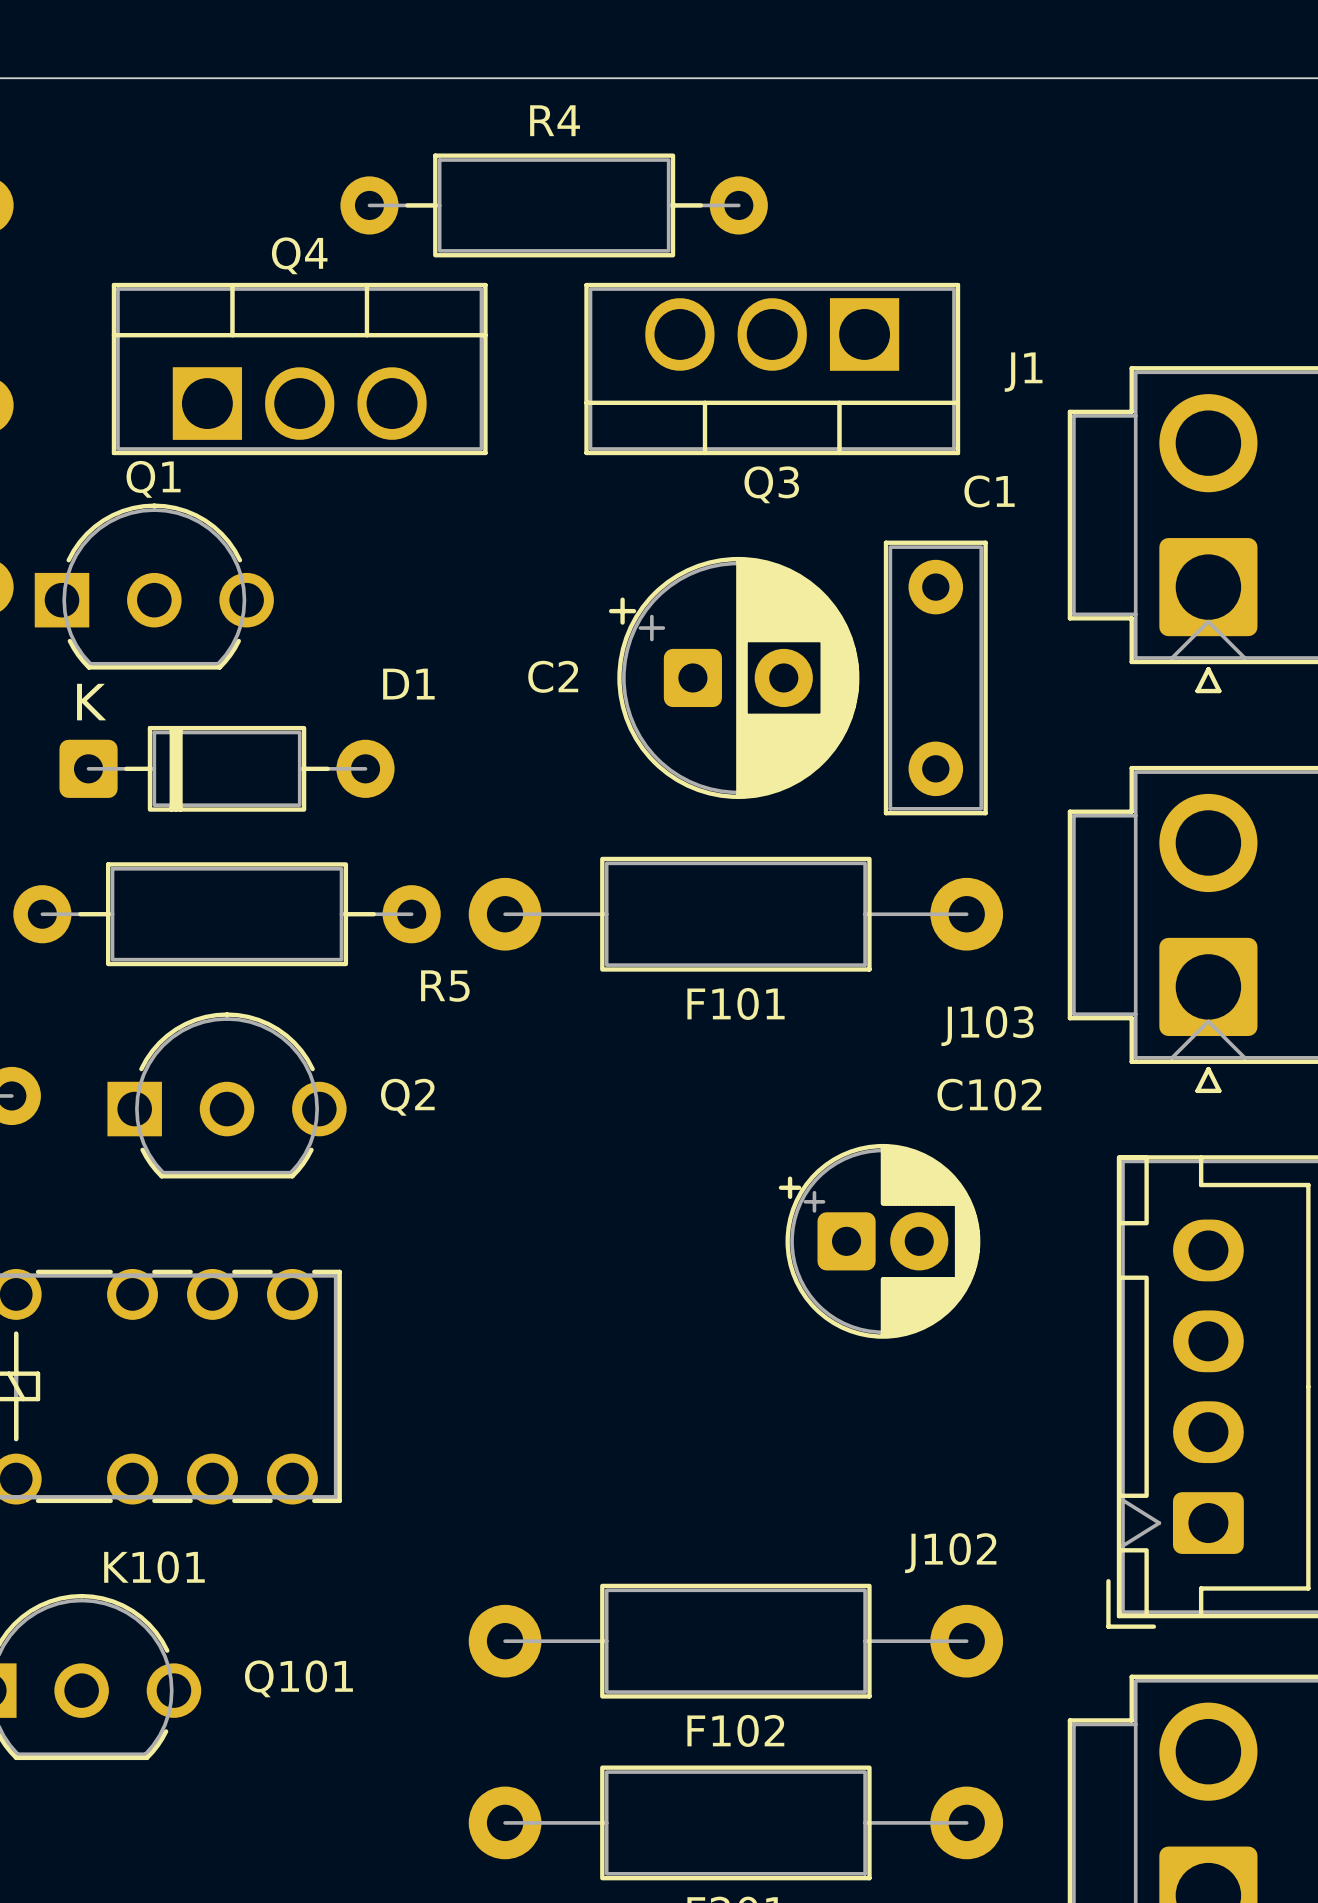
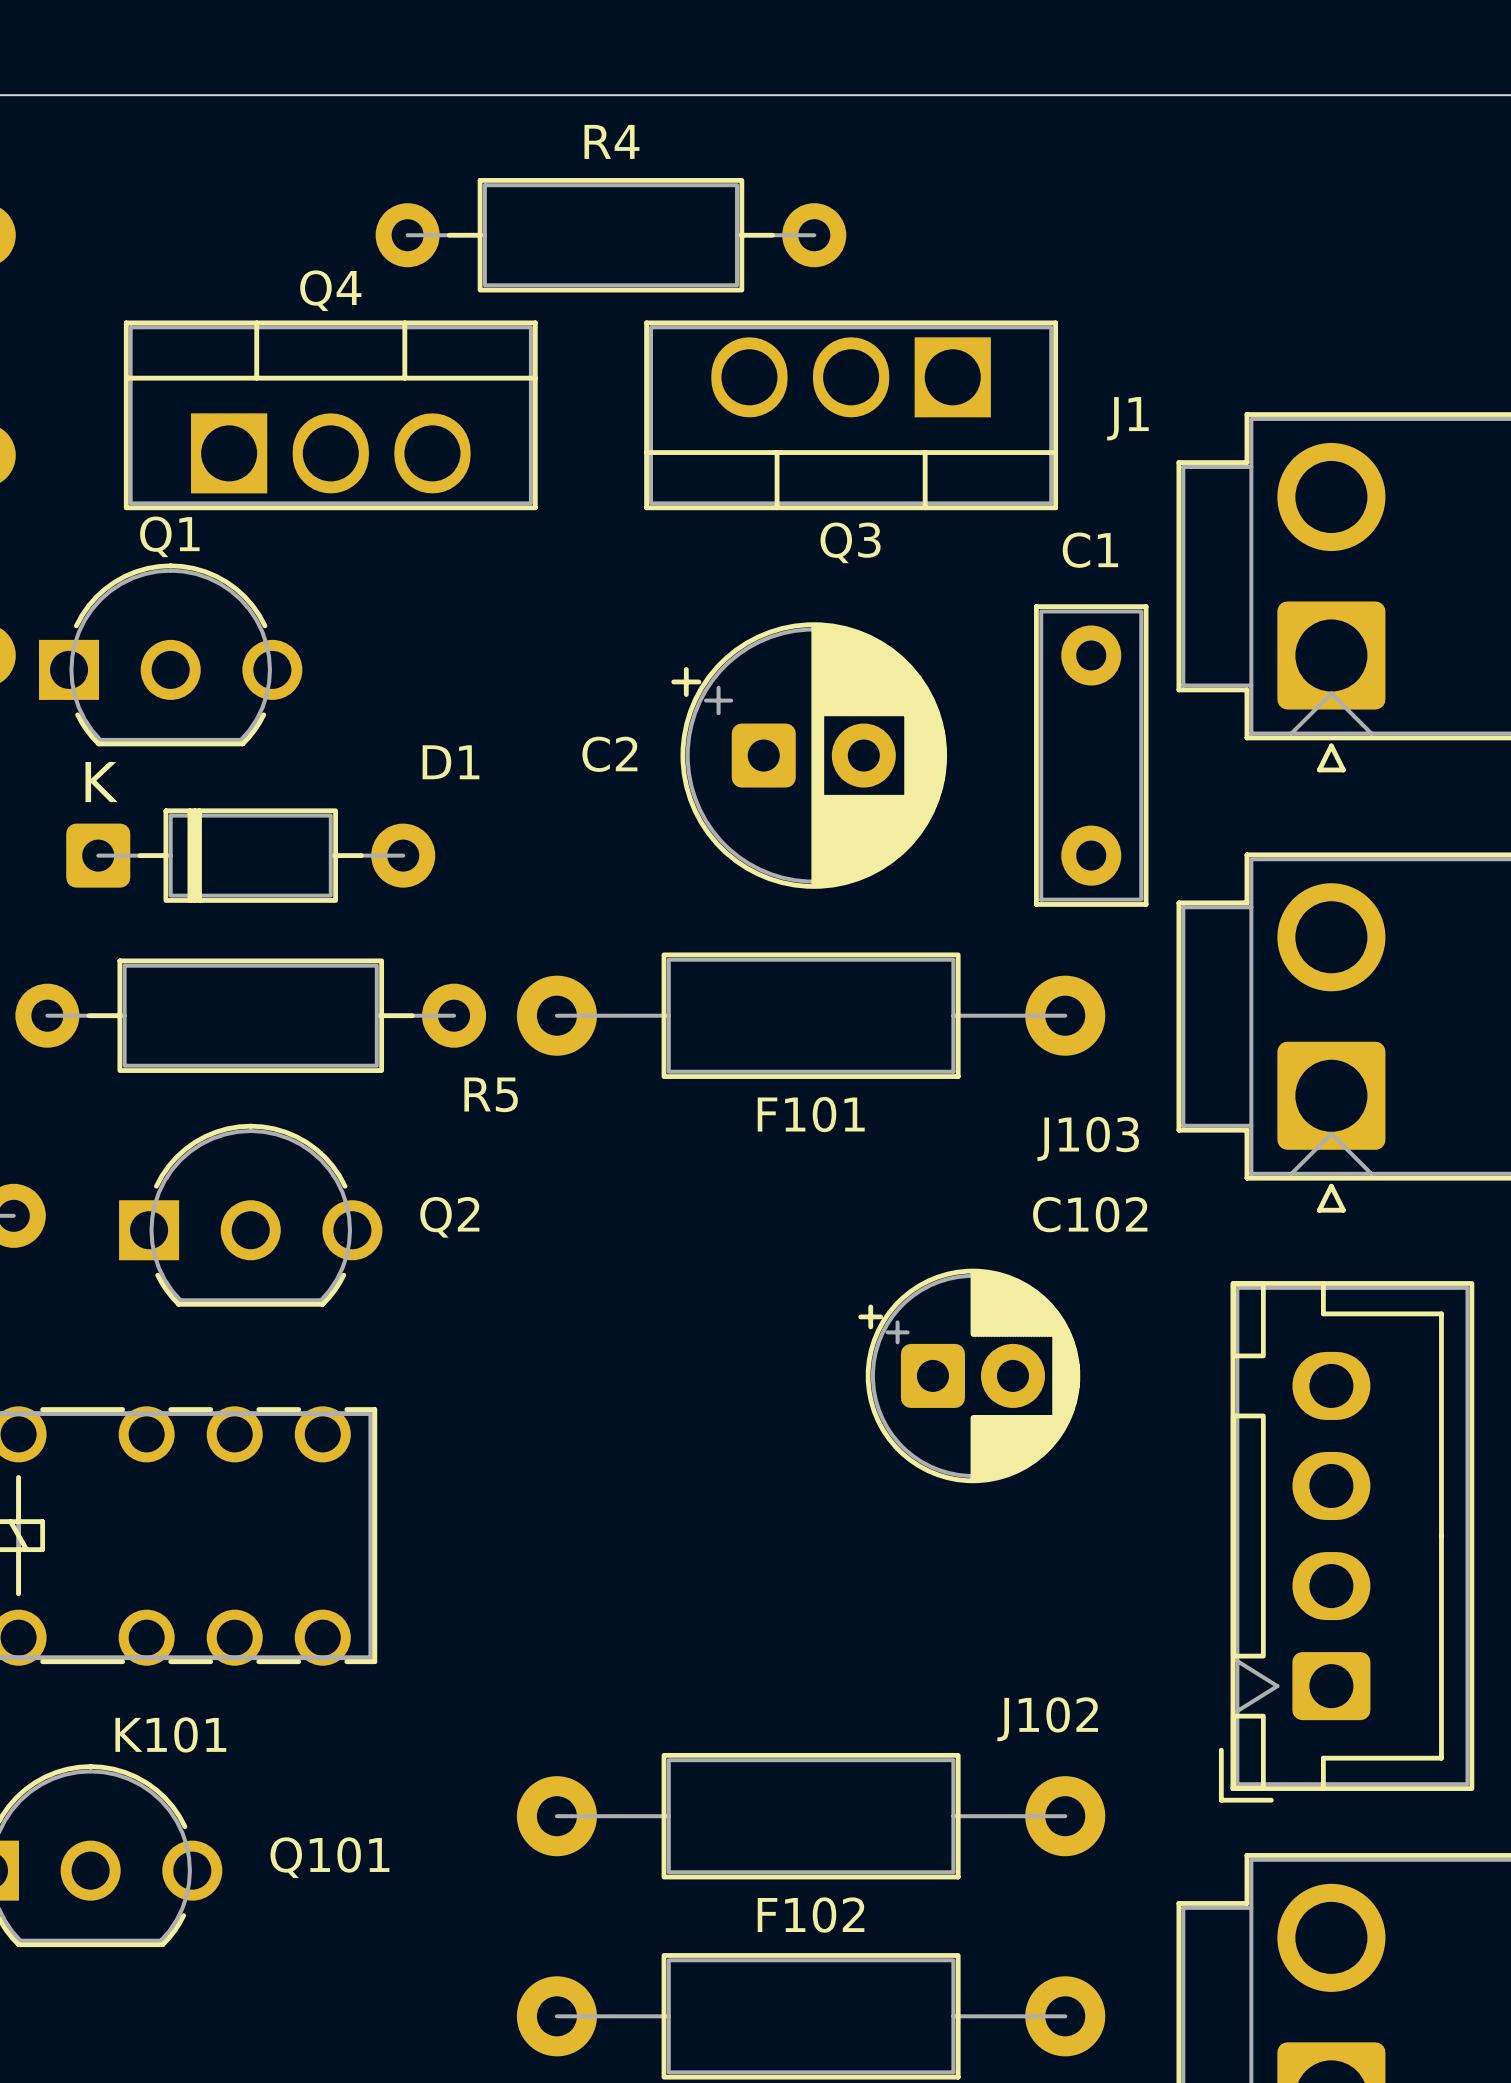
C1 position: (935, 677) -> (1091, 755)

